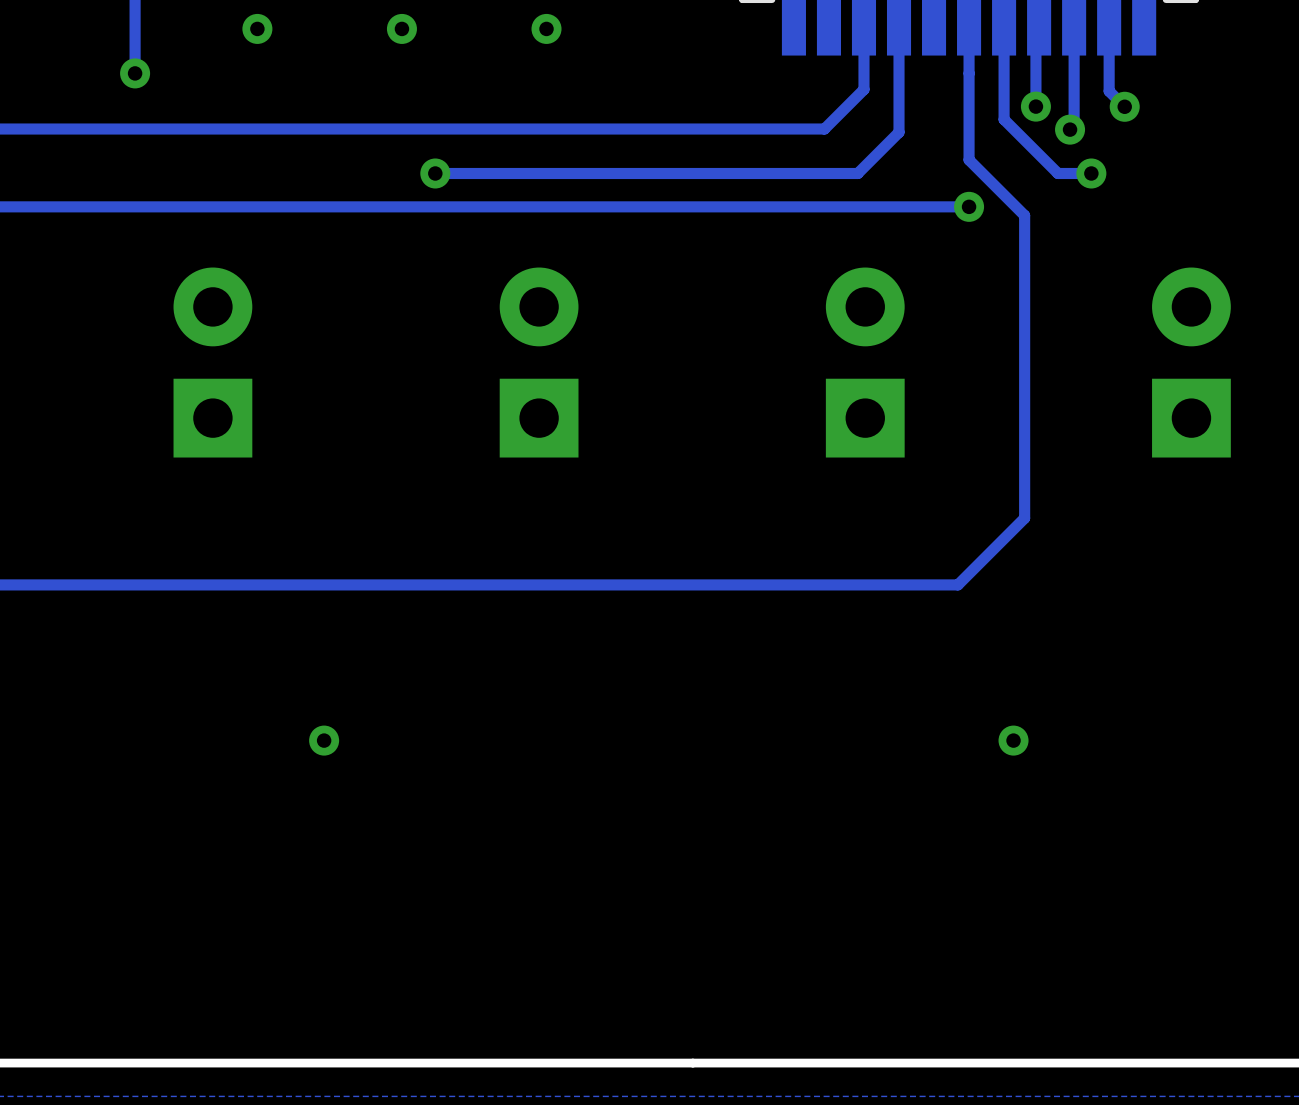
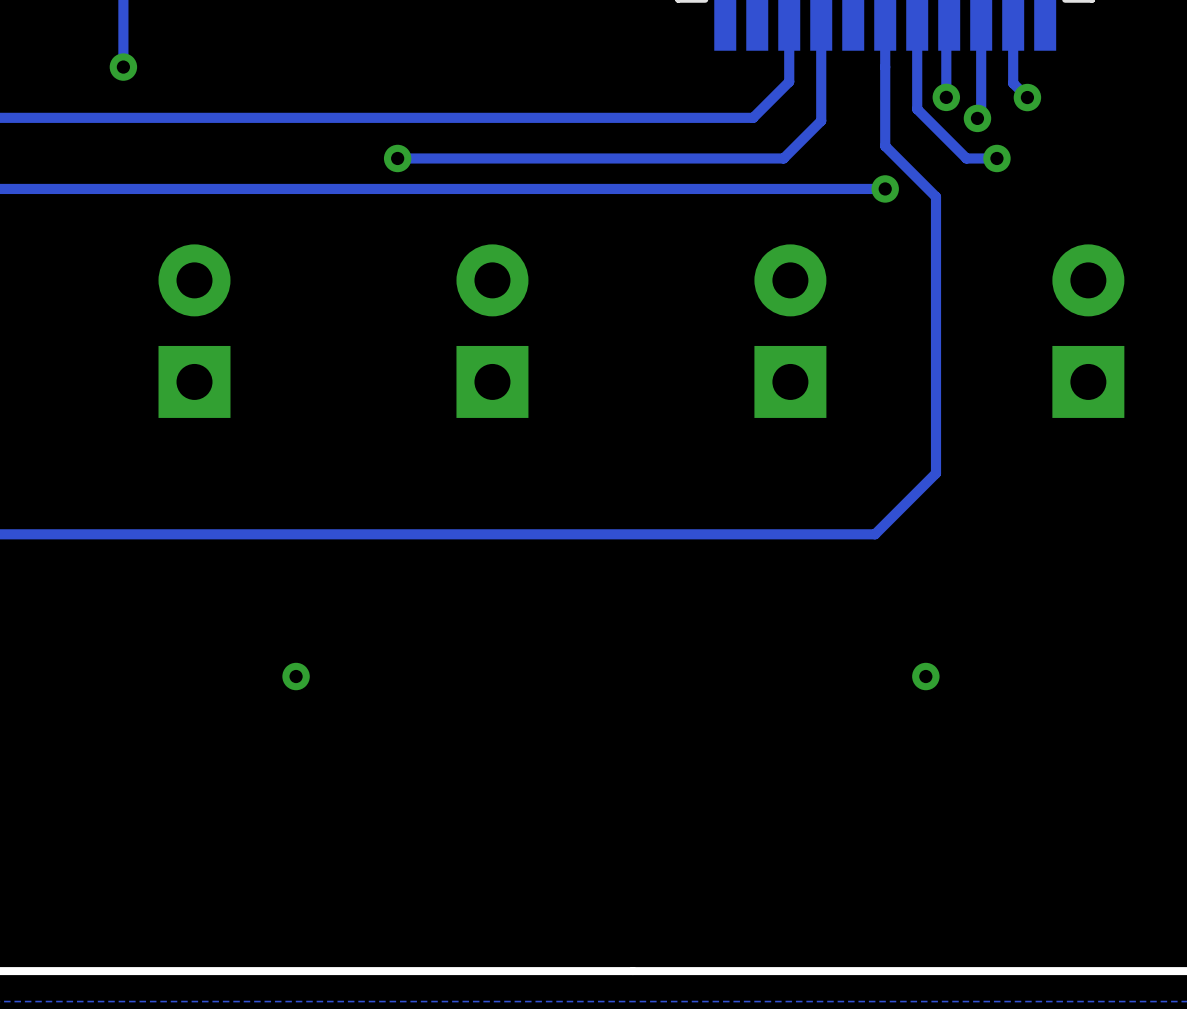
via: (257, 28) -> none
via: (401, 28) -> none
via: (546, 28) -> none

